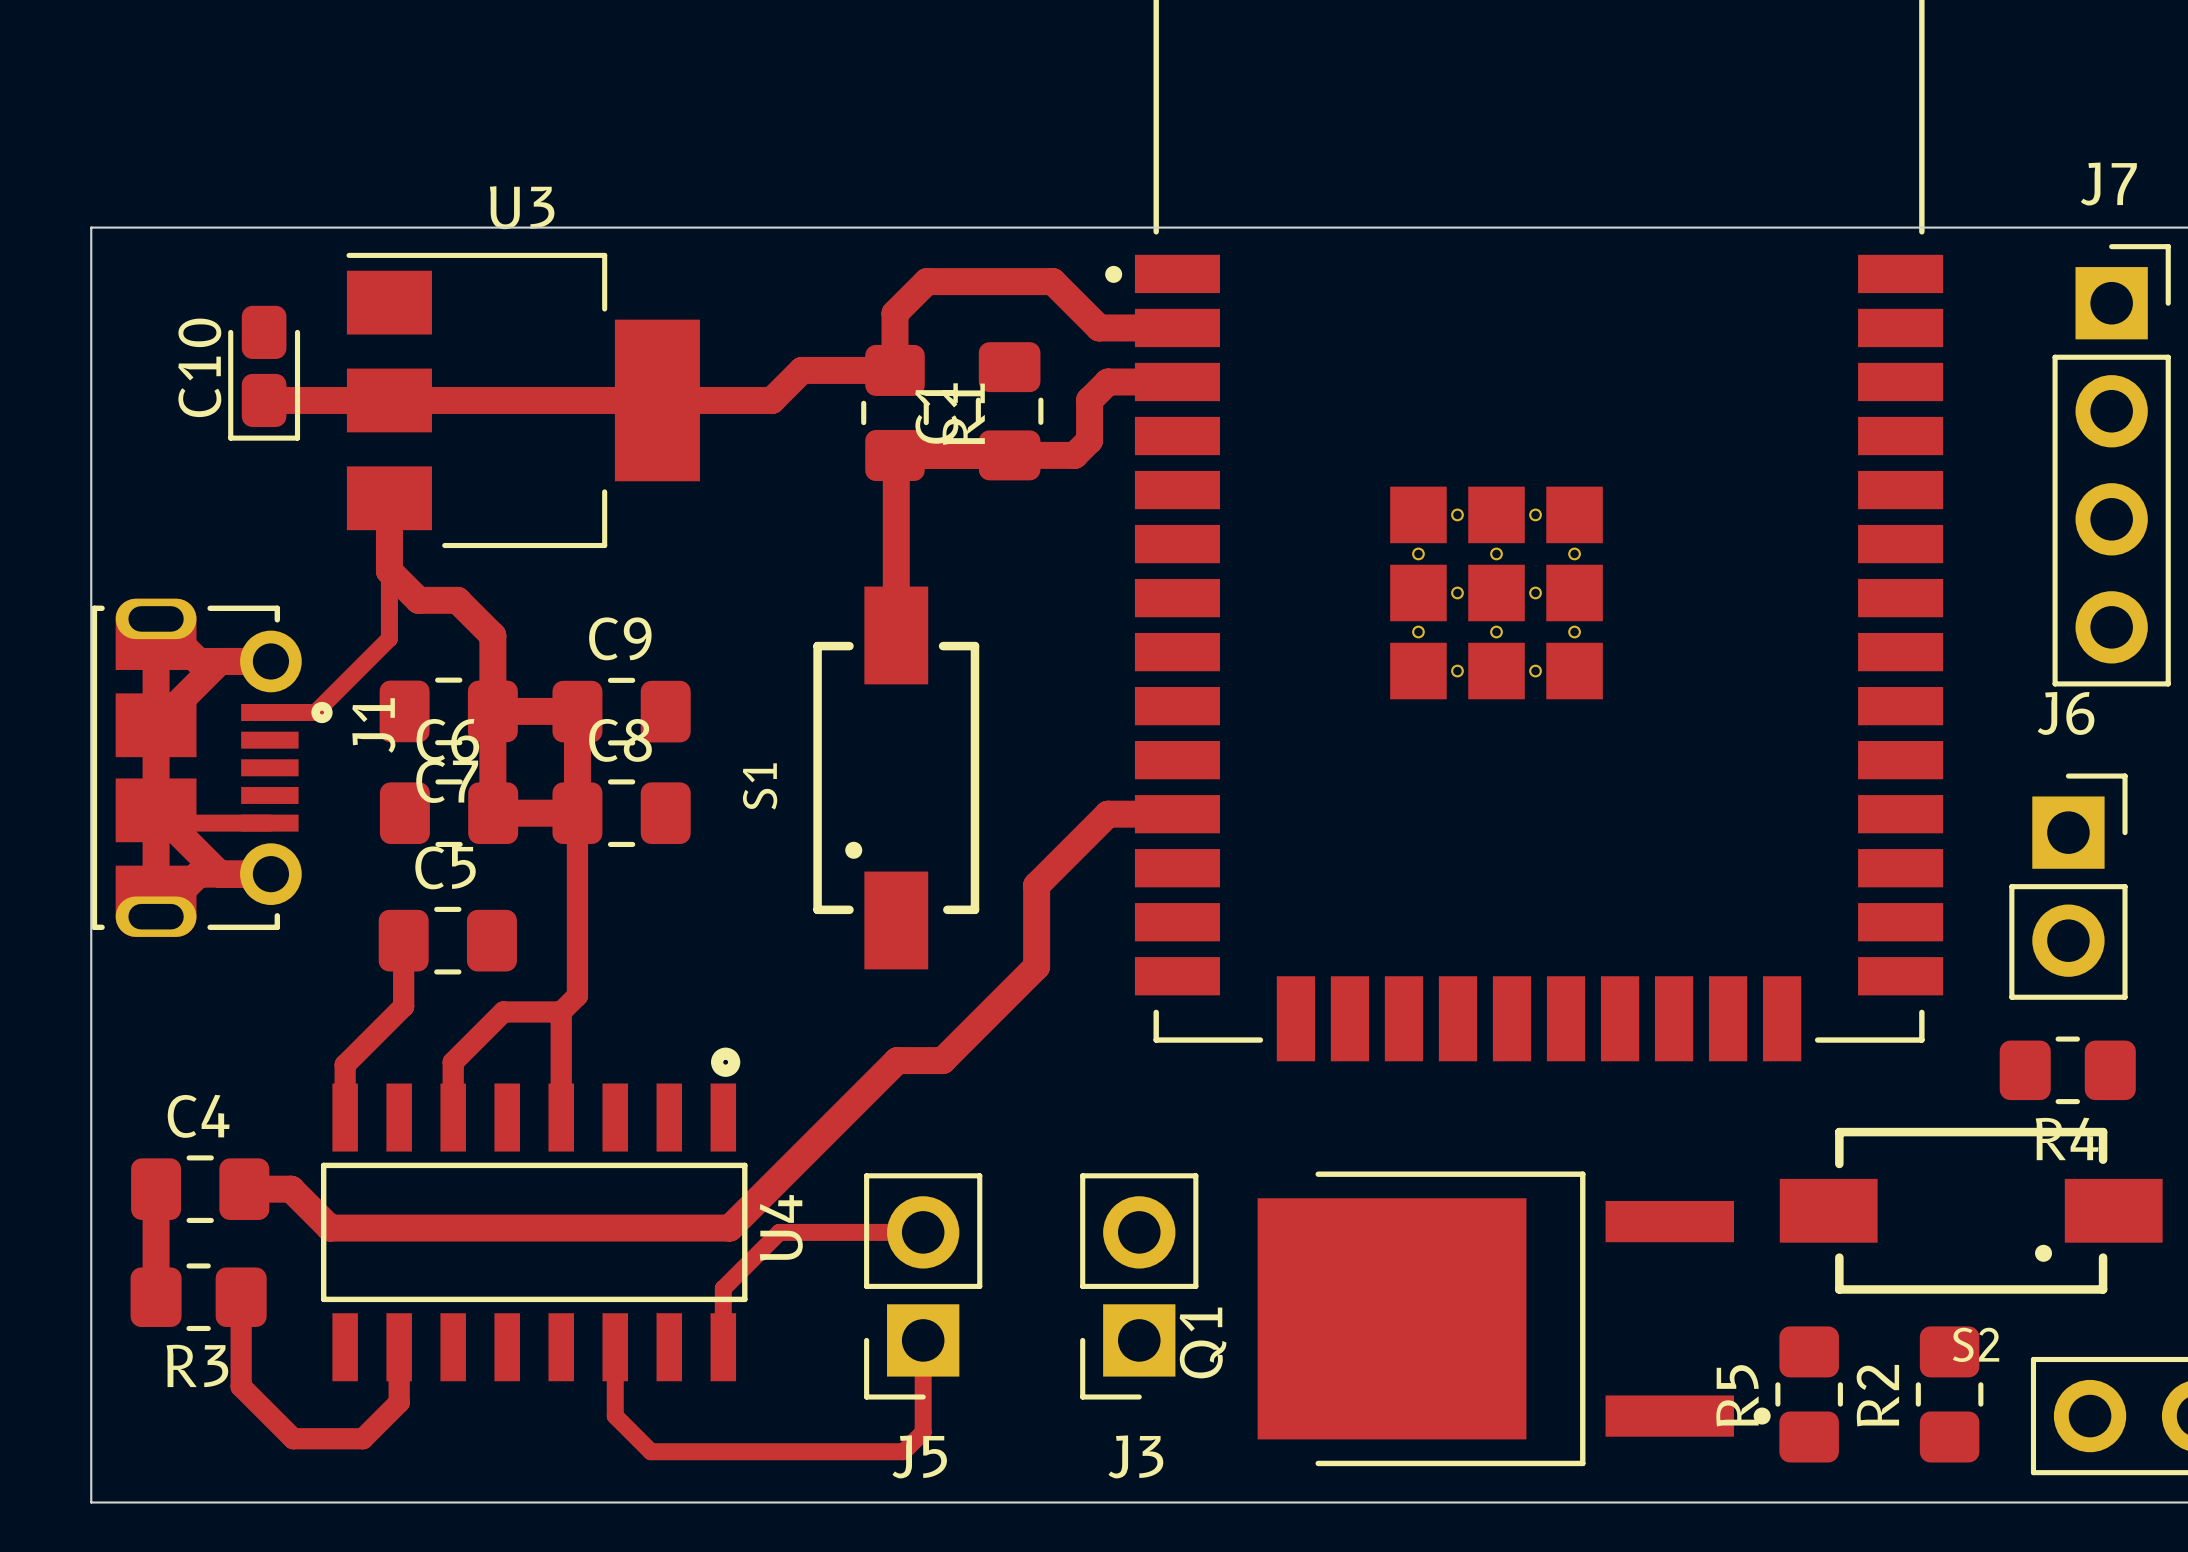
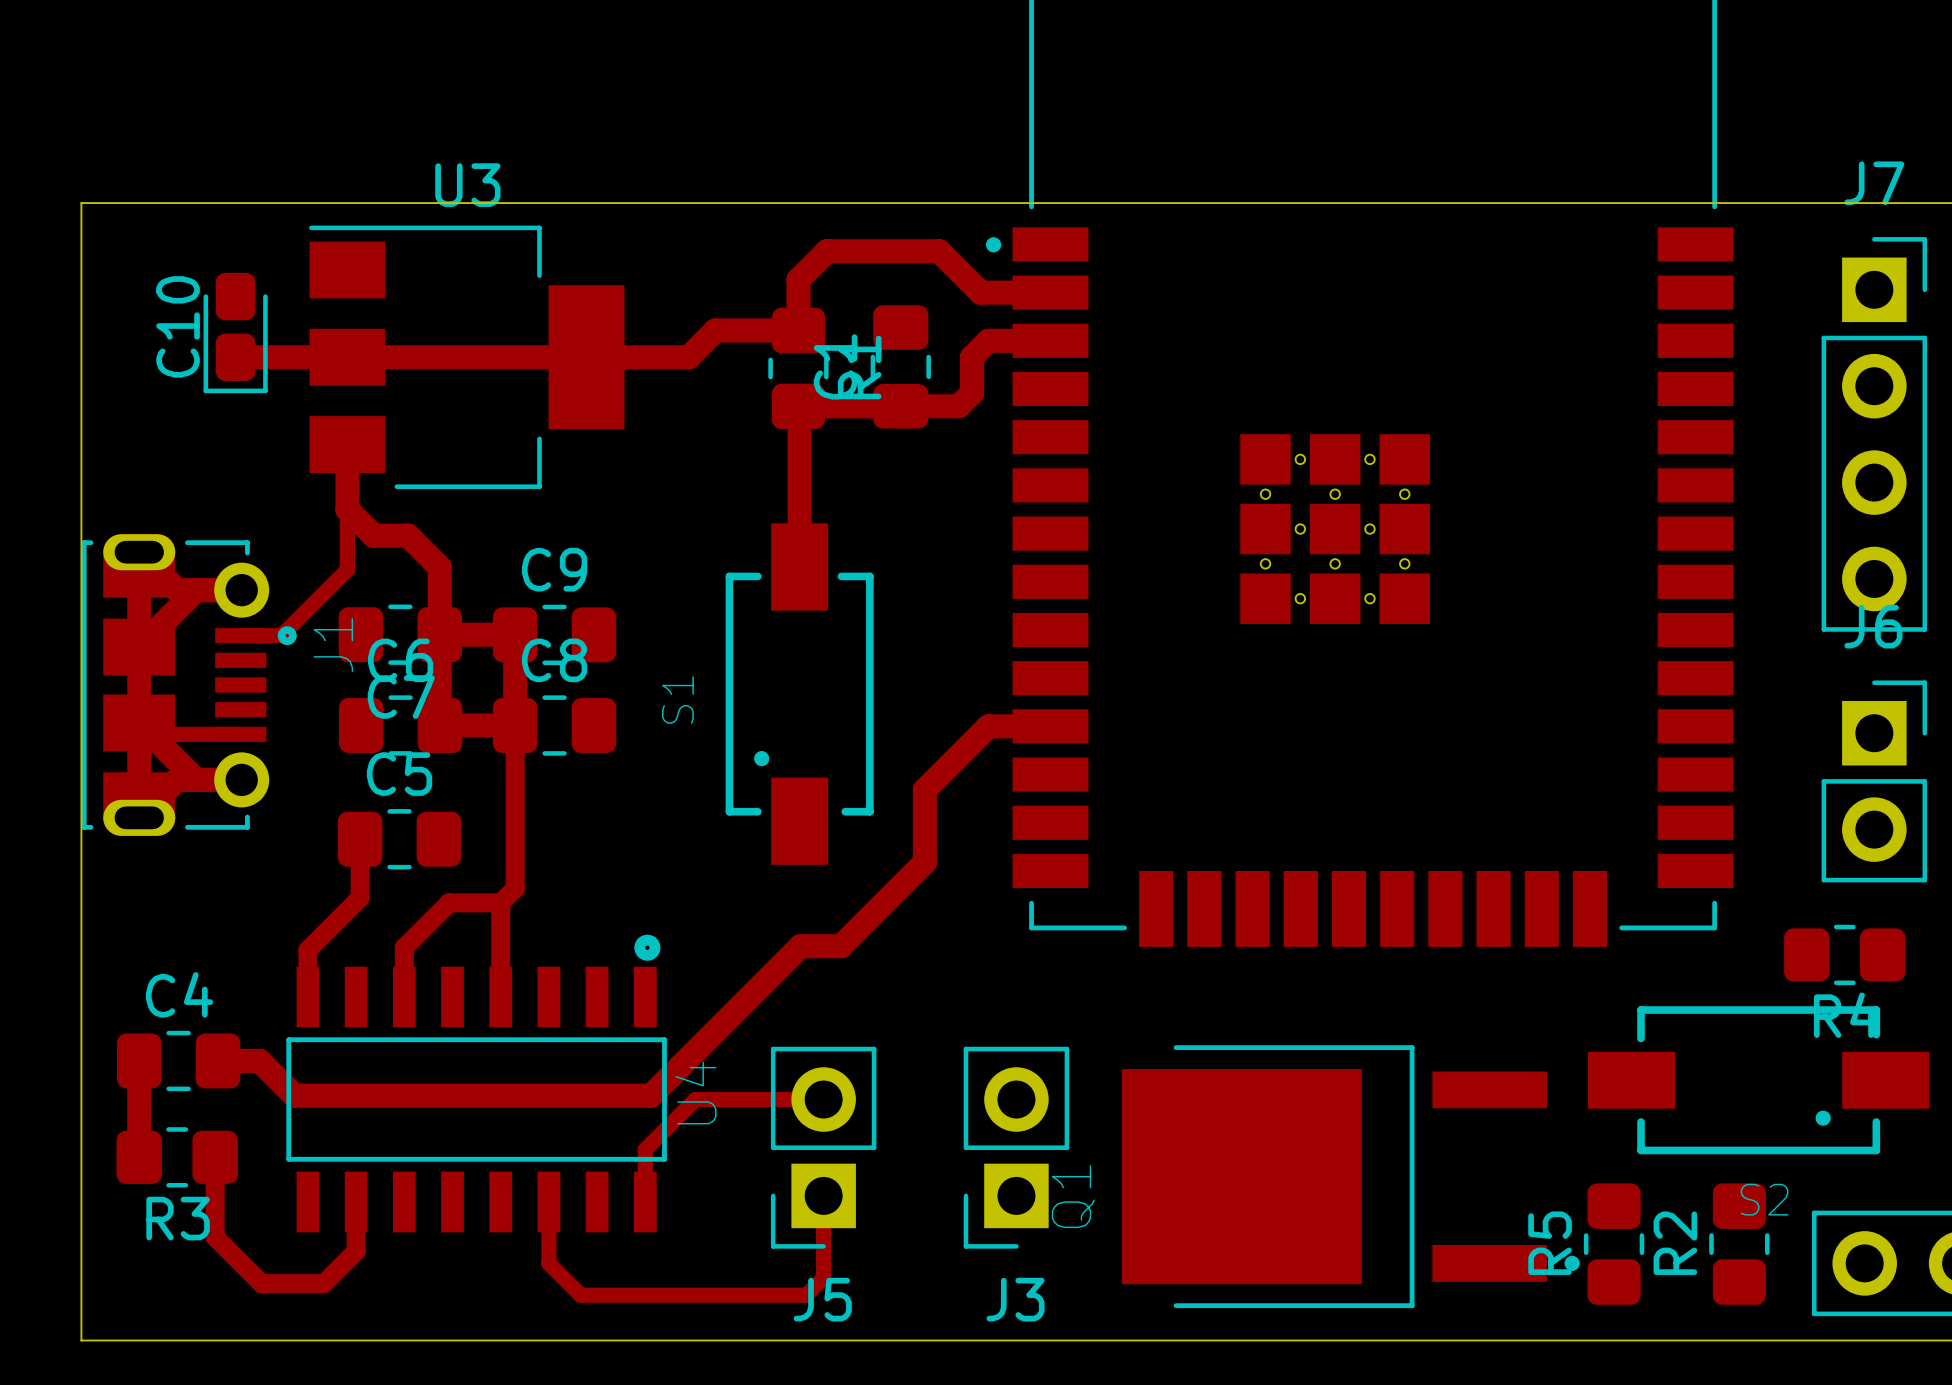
J7 position: (2111, 465) -> (1874, 434)
J6 position: (2068, 886) -> (1874, 781)

